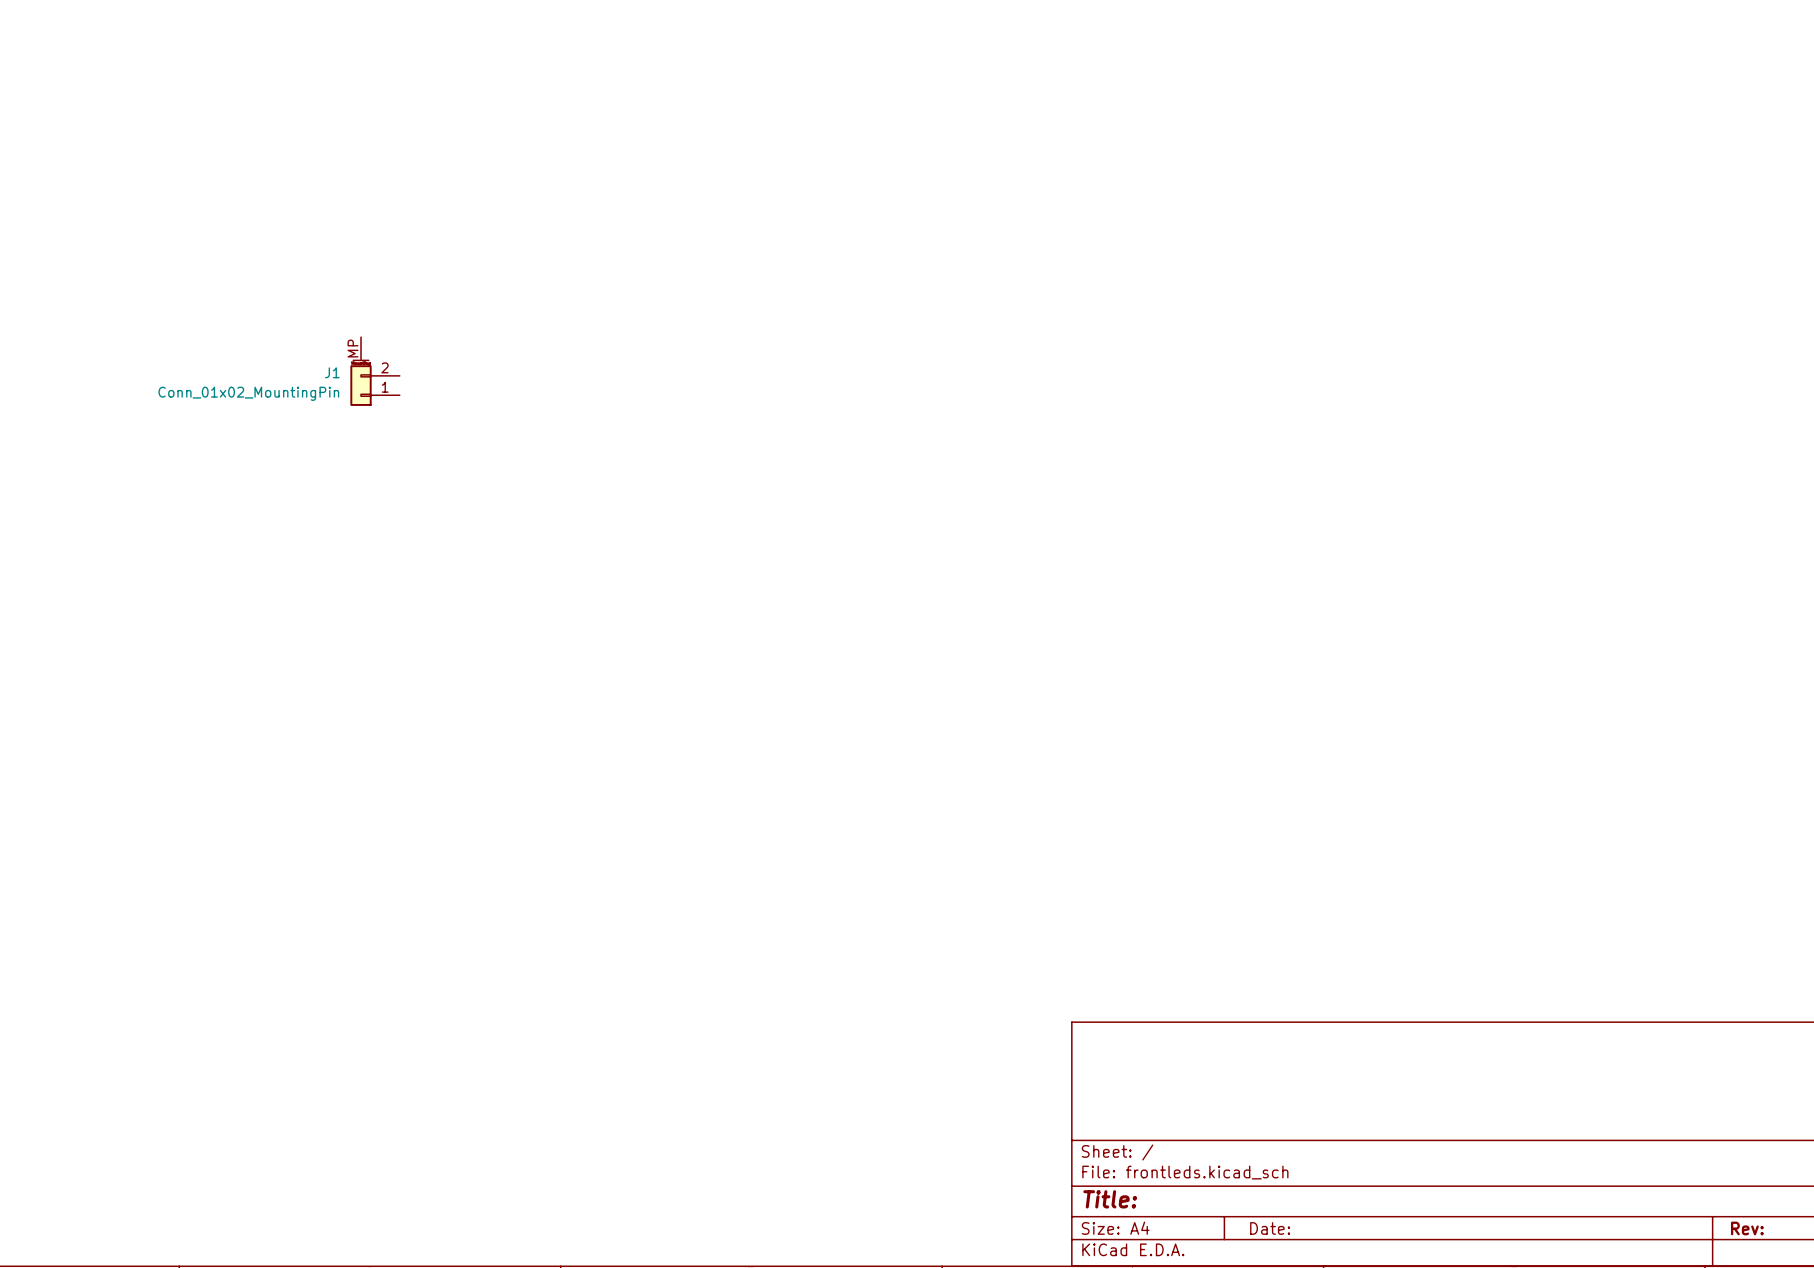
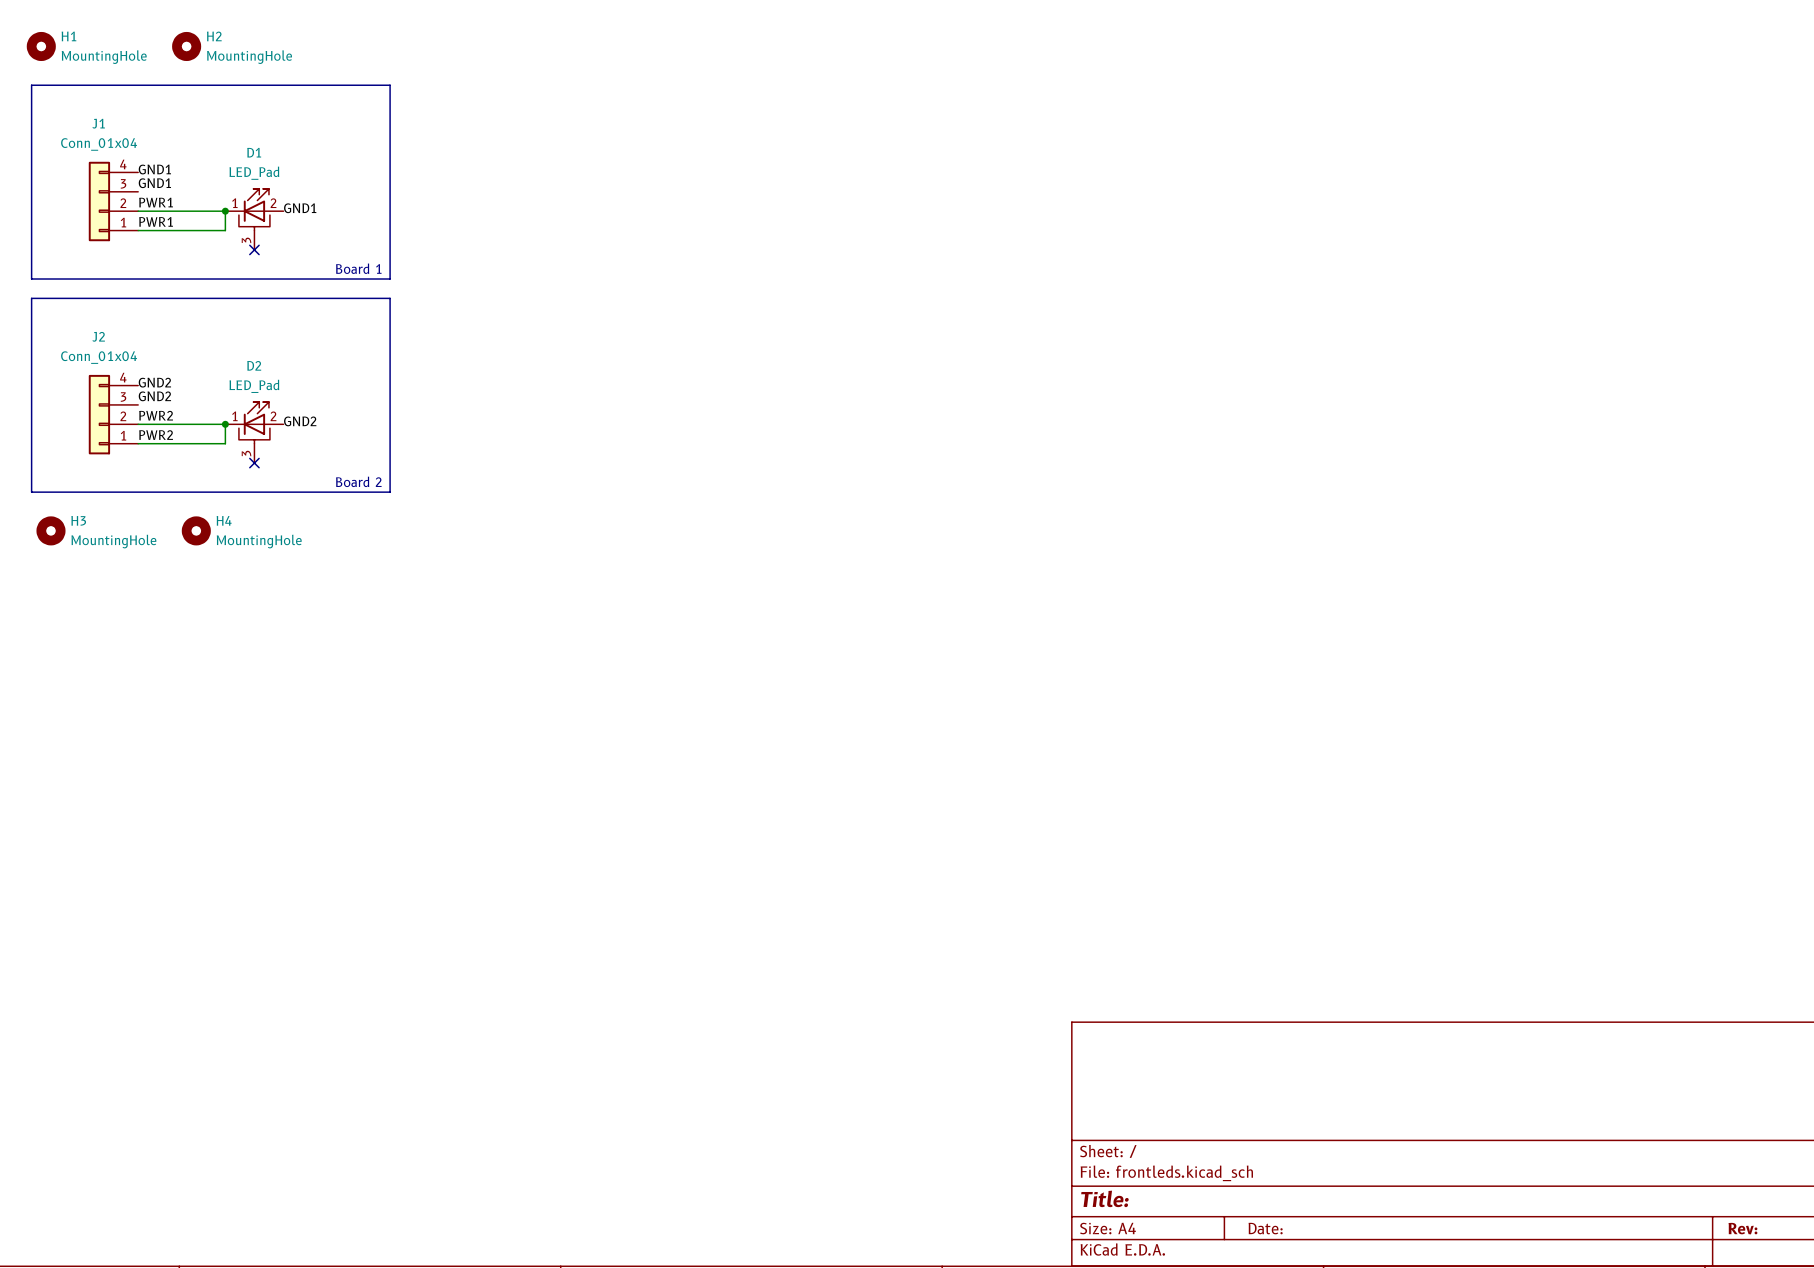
H1: none -> MountingHole (41, 46)
H2: none -> MountingHole (186, 46)
line: none -> (31, 85) (390, 85) (390, 279) (31, 279) (31, 85)
label: none -> GND1 (154, 169)
label: none -> GND1 (154, 183)
label: none -> PWR1 (156, 202)
label: none -> GND1 (300, 208)
wire: none -> (138, 211) (225, 211) (225, 230) (138, 230)
junction: none -> (225, 211)
D1: none -> LED_Pad (254, 219)
label: none -> PWR1 (156, 221)
no-connect mark: none -> (254, 249)
text: none -> Board 1 (358, 268)
line: none -> (31, 298) (31, 492) (390, 492) (390, 298) (31, 298)
J1 symbol: [350, 337, 400, 406] -> [88, 161, 139, 242]
J1 name position: J1 (332, 372) -> J1 (98, 123)
label: none -> GND2 (154, 382)
J1 value: Conn_01x02_MountingPin (248, 393) -> Conn_01x04 (99, 144)
label: none -> GND2 (154, 396)
J2: none -> Conn_01x04 (113, 414)
label: none -> PWR2 (156, 415)
label: none -> GND2 (300, 421)
wire: none -> (138, 424) (225, 424) (225, 443) (138, 443)
junction: none -> (225, 424)
D2: none -> LED_Pad (254, 432)
label: none -> PWR2 (156, 435)
no-connect mark: none -> (254, 463)
text: none -> Board 2 (358, 481)
H3: none -> MountingHole (50, 530)
H4: none -> MountingHole (196, 530)

